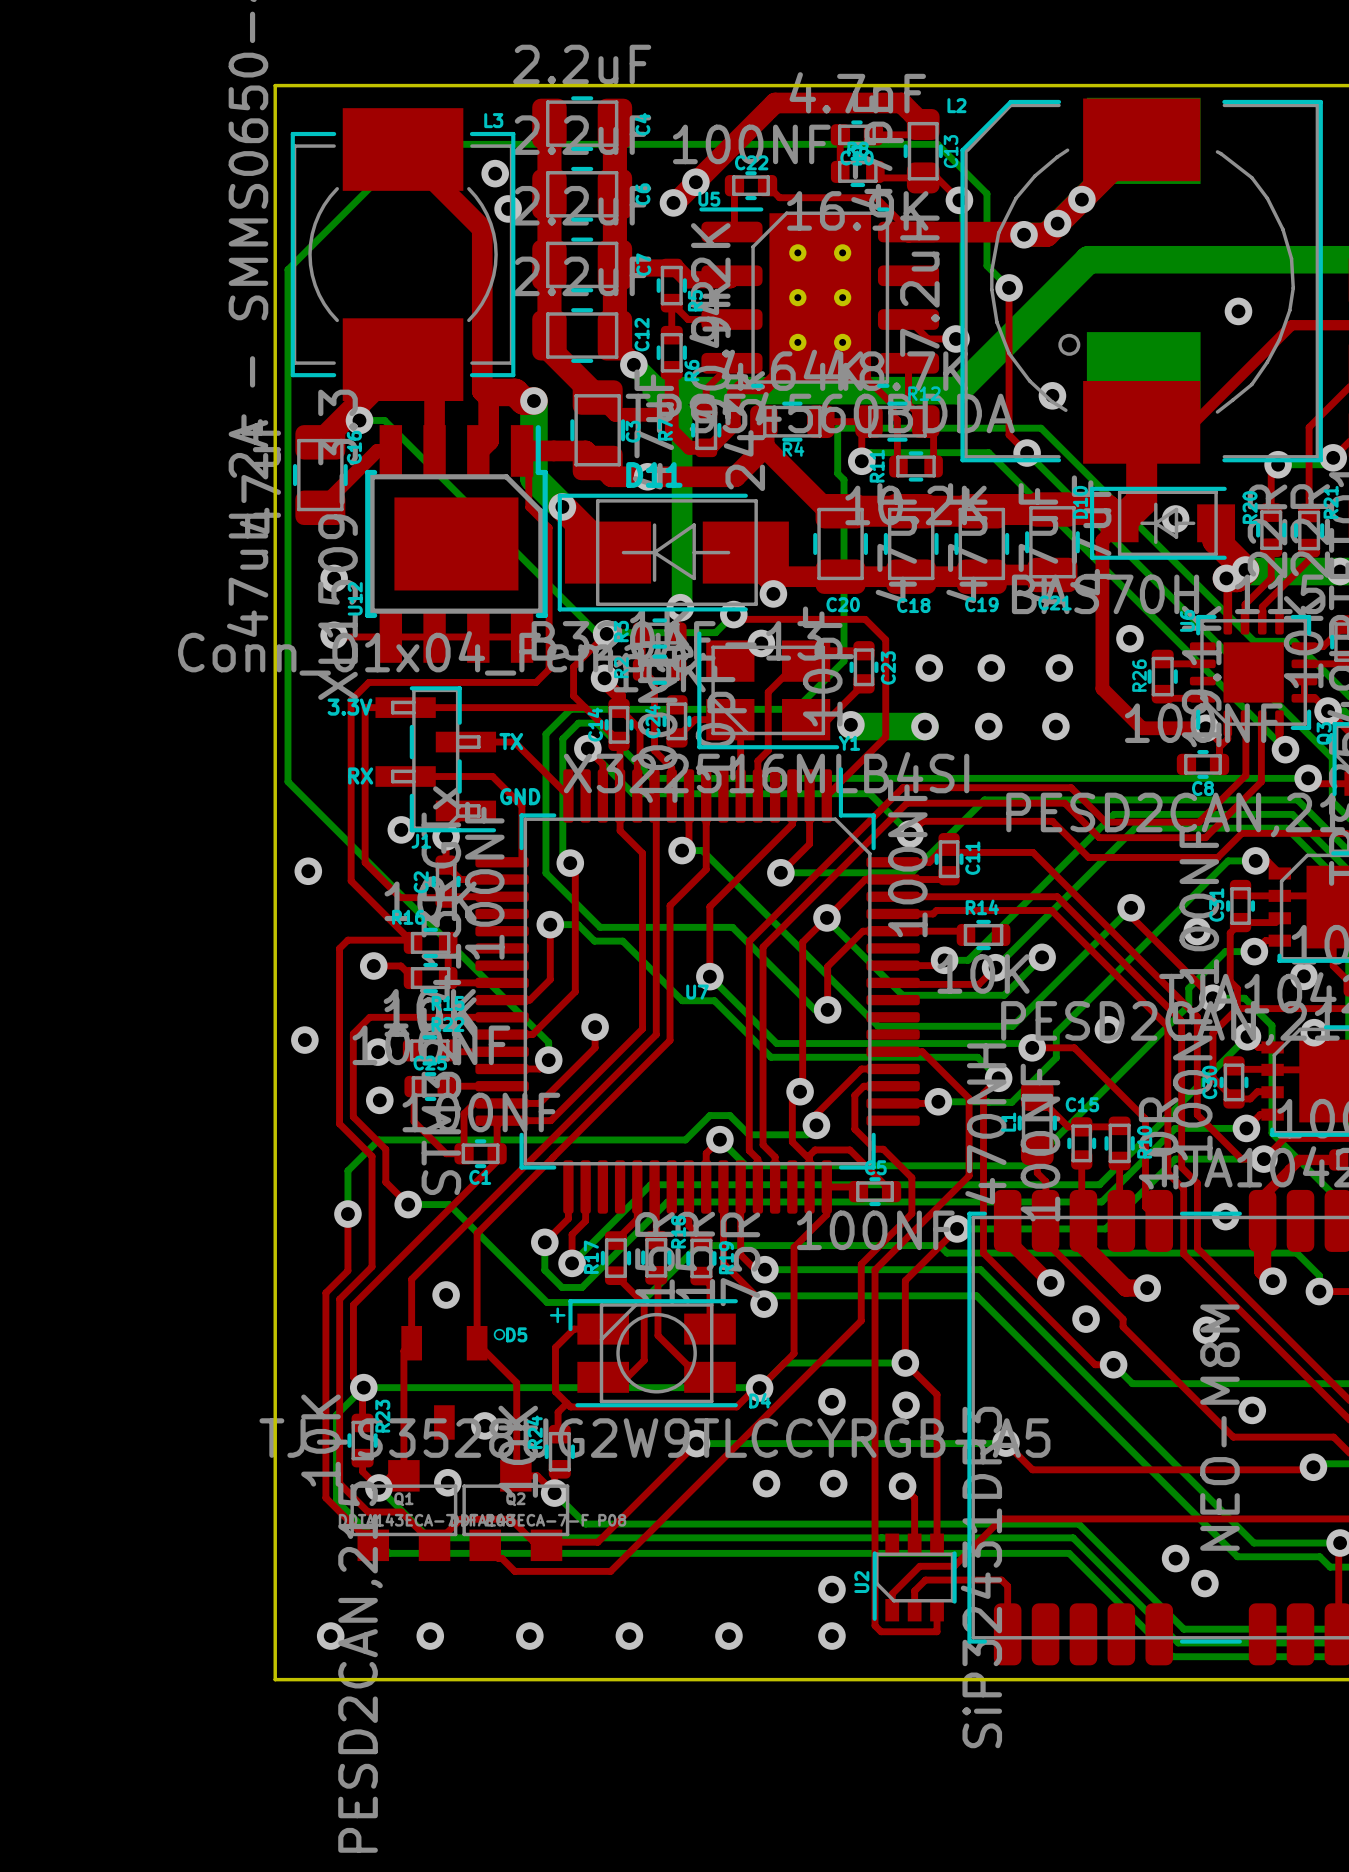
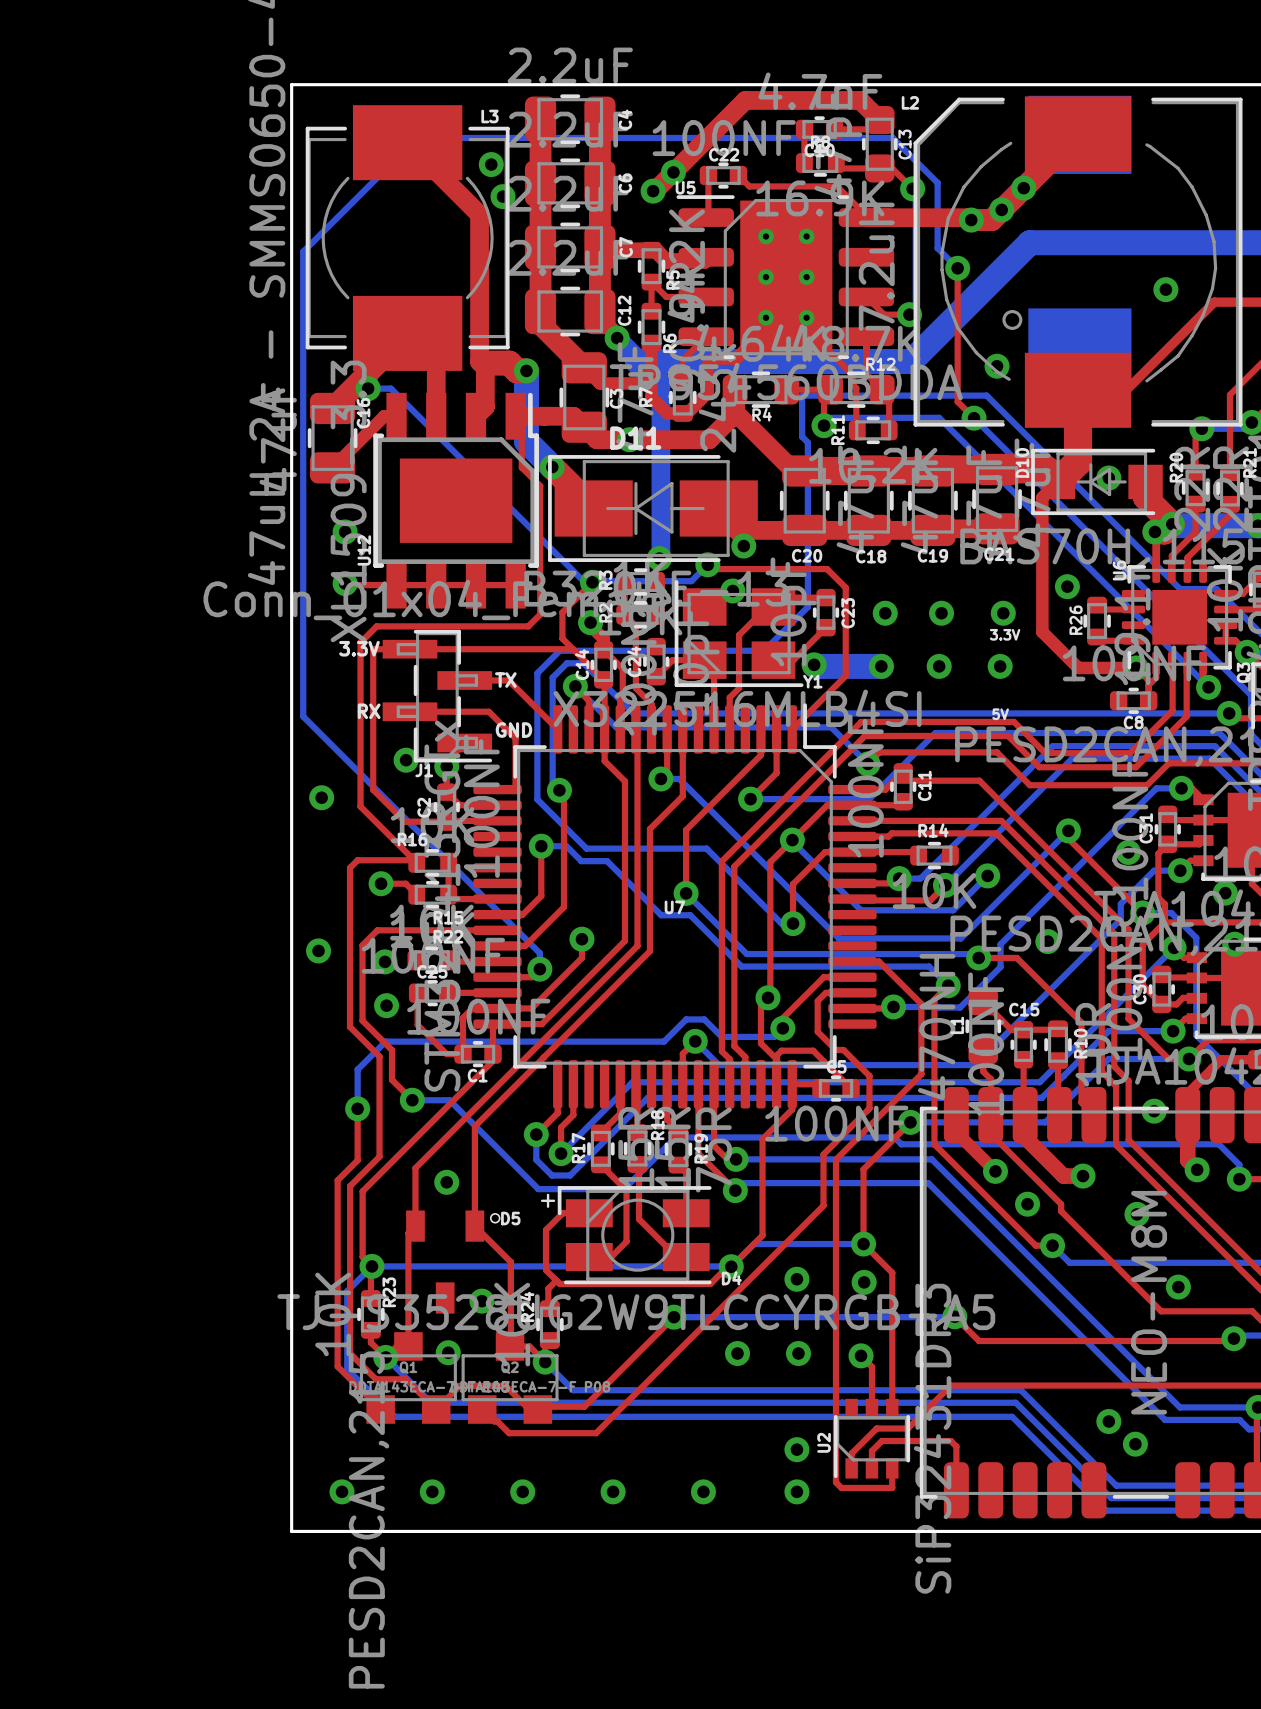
text: none -> 3.3V (1005, 634)
text: none -> 5V (1000, 714)

